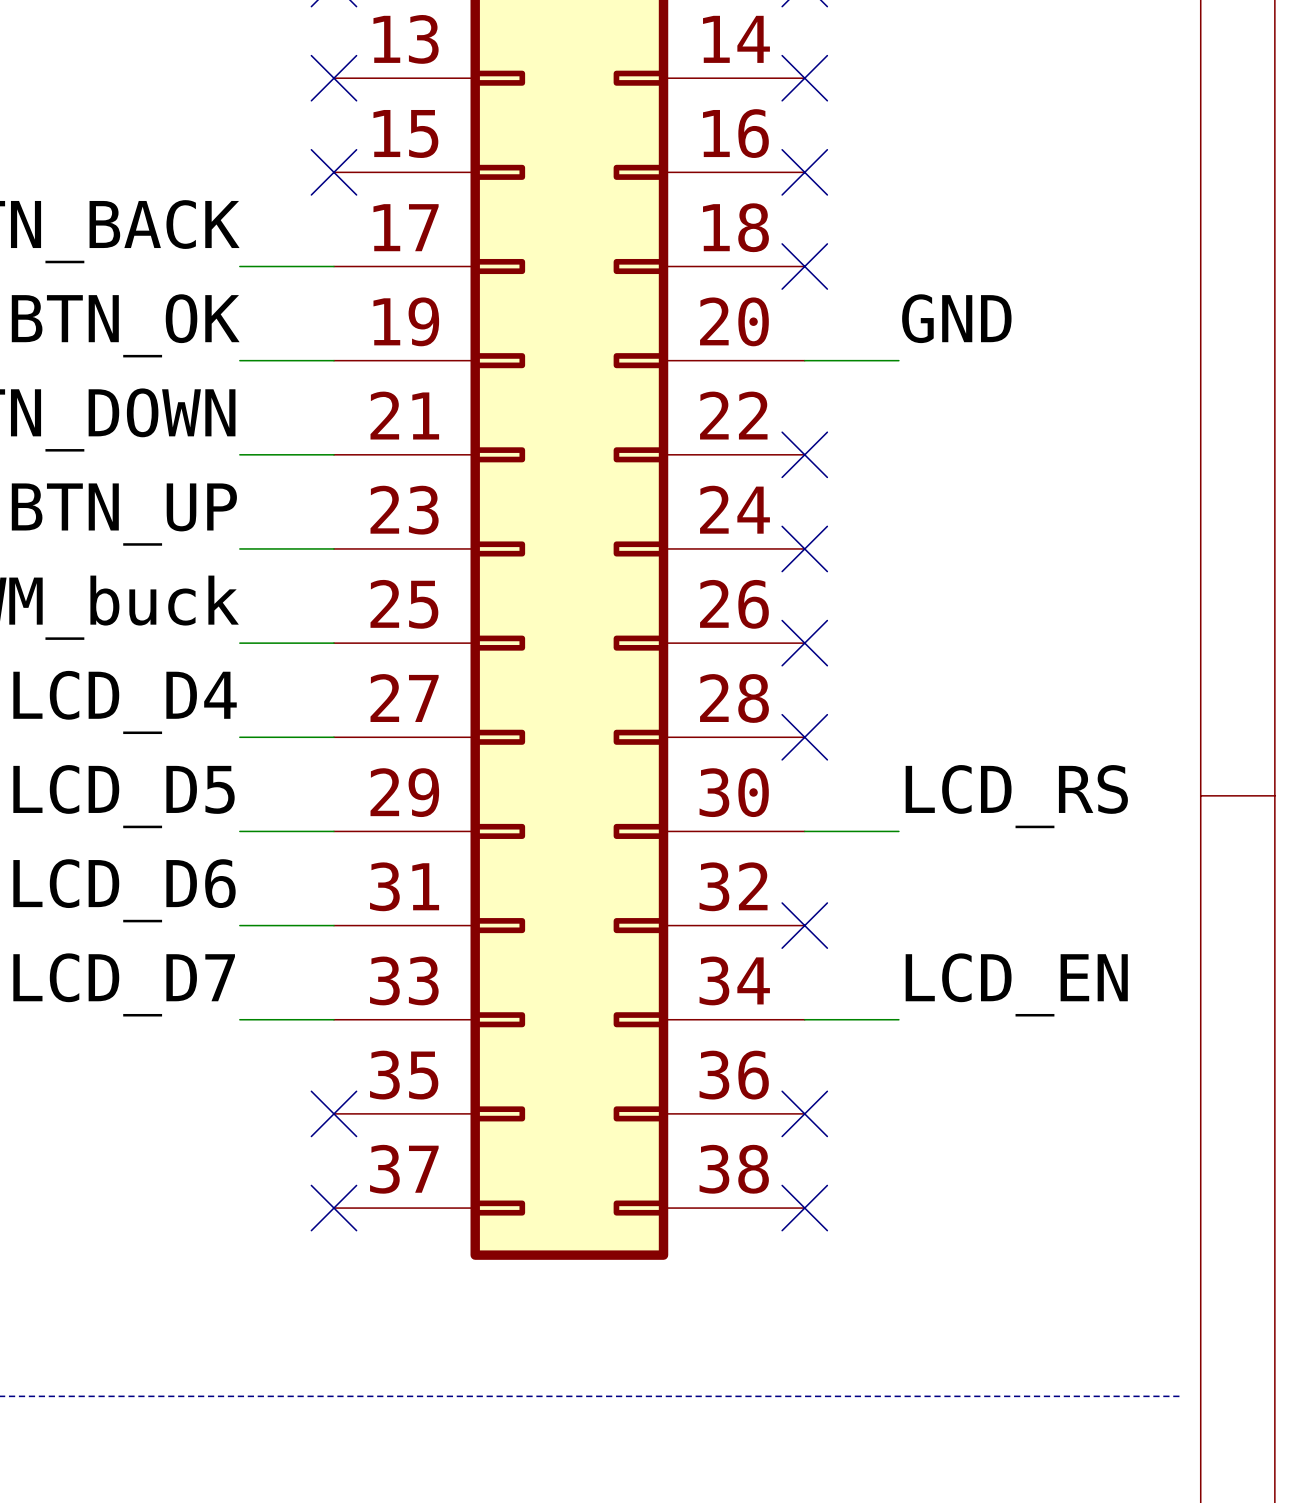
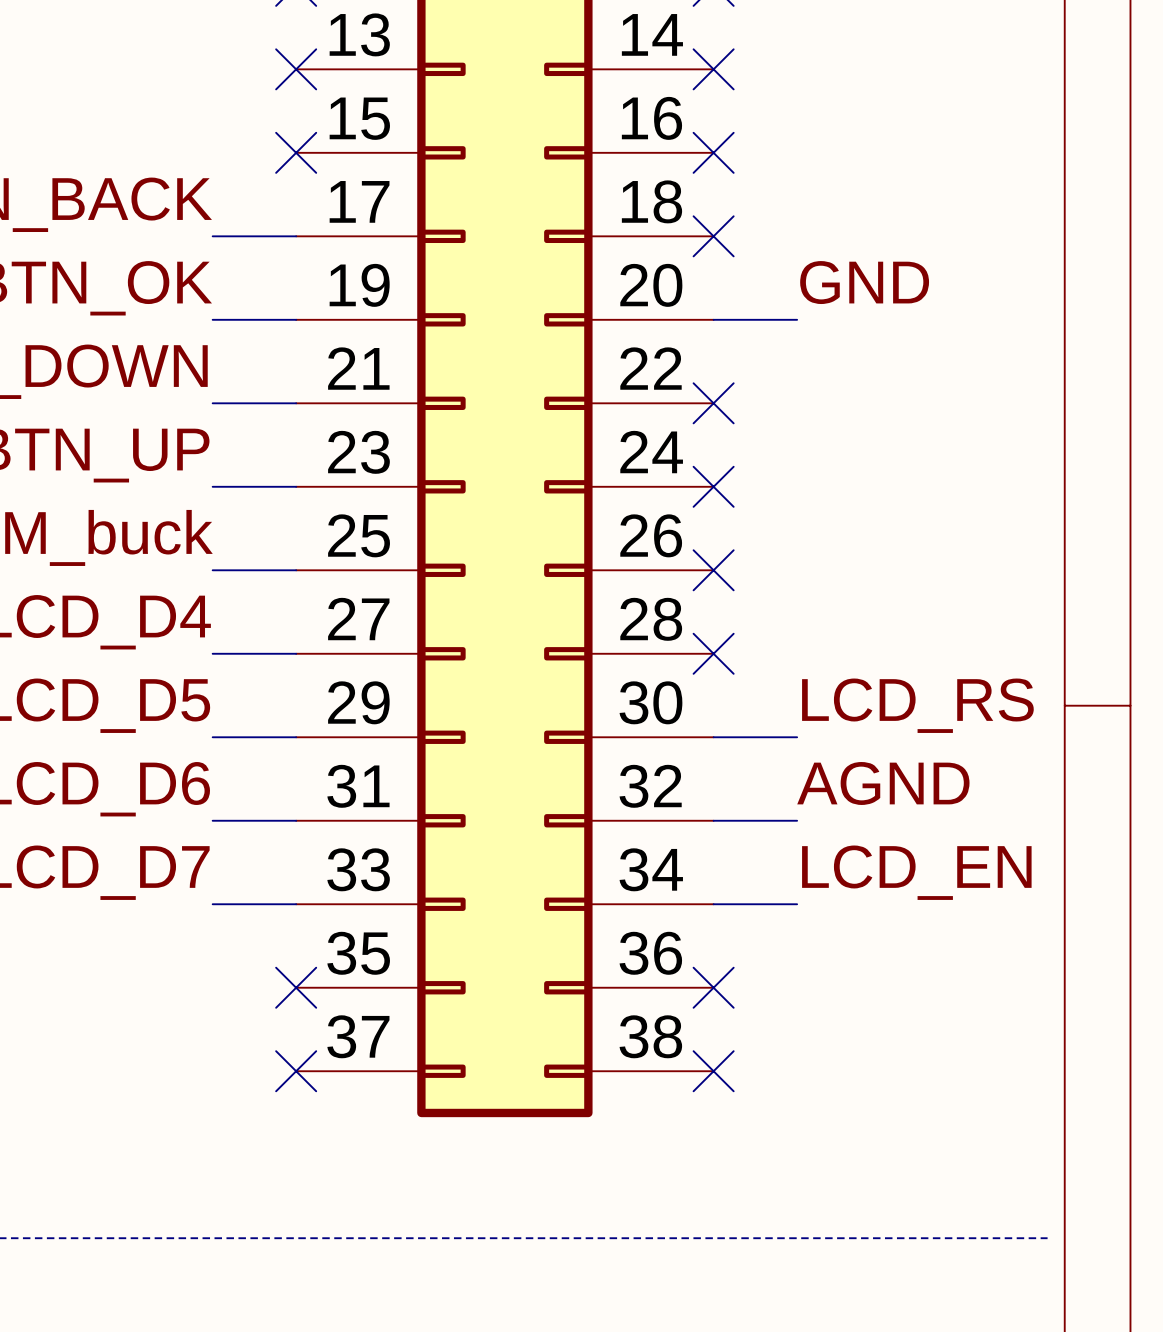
label: none -> AGND (883, 783)
wire: none -> (713, 820) (797, 820)
no-connect mark: (804, 925) -> none

